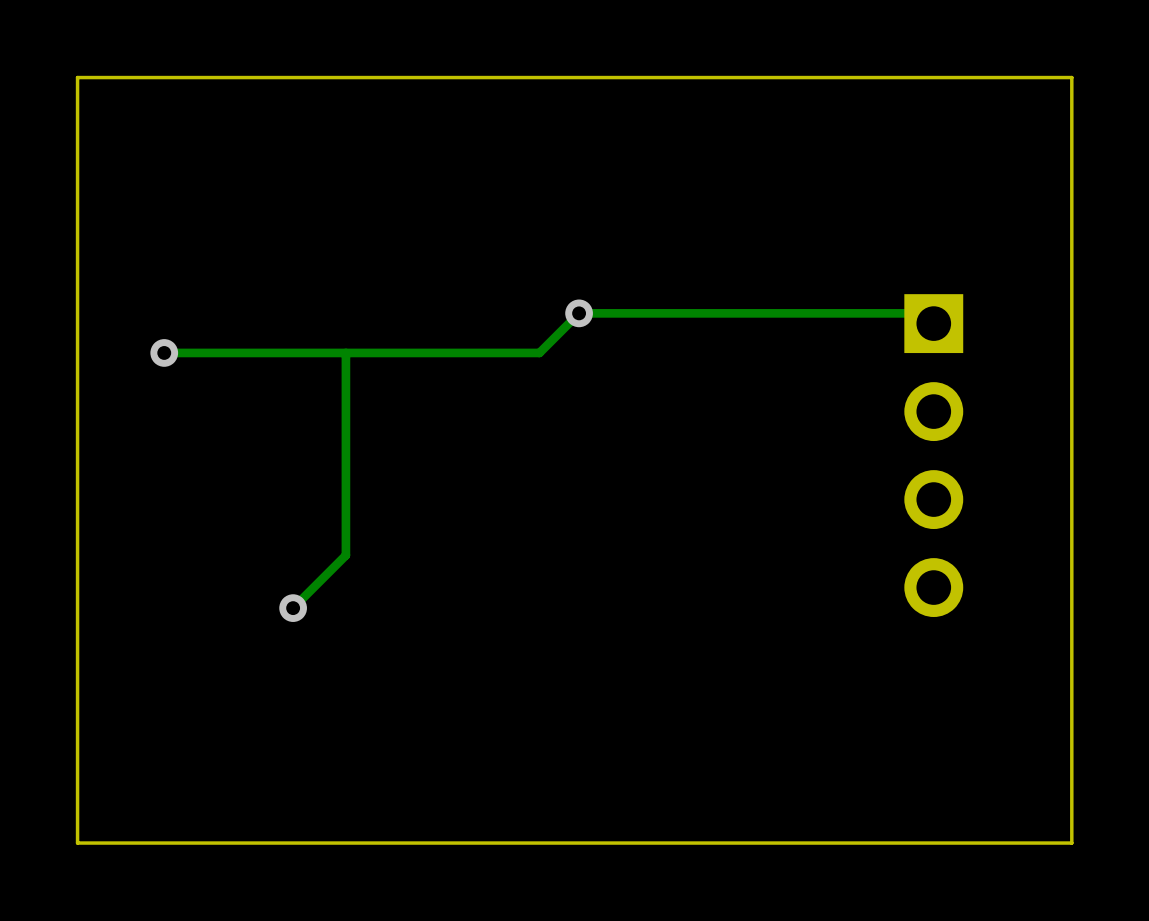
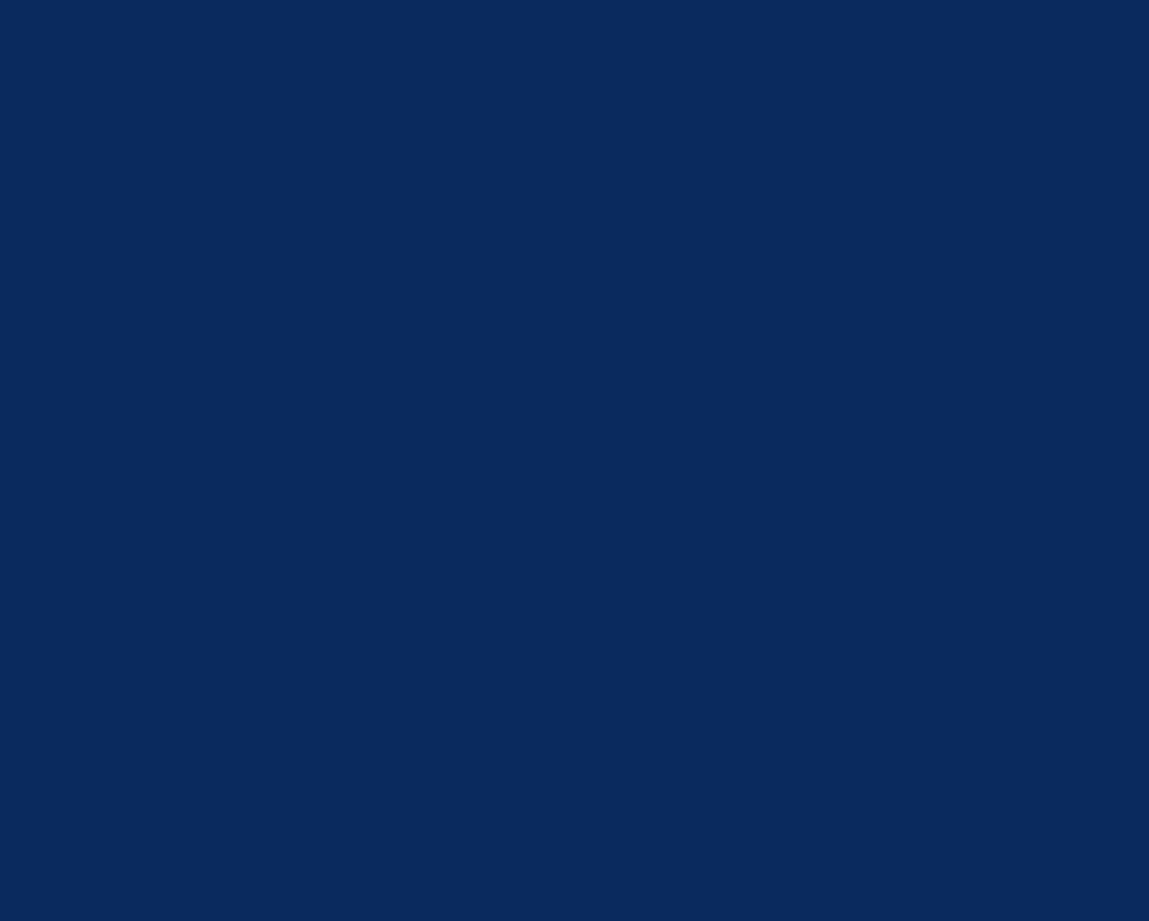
board edge: (1071, 77) (1071, 843) (77, 843) (77, 77) (1071, 77) -> none
via: (579, 313) -> none
track: (923, 313) (579, 313) (539, 352) (164, 352) -> none
via: (164, 352) -> none
track: (345, 352) (345, 555) (293, 608) -> none
part: (933, 455) -> none
via: (293, 608) -> none

